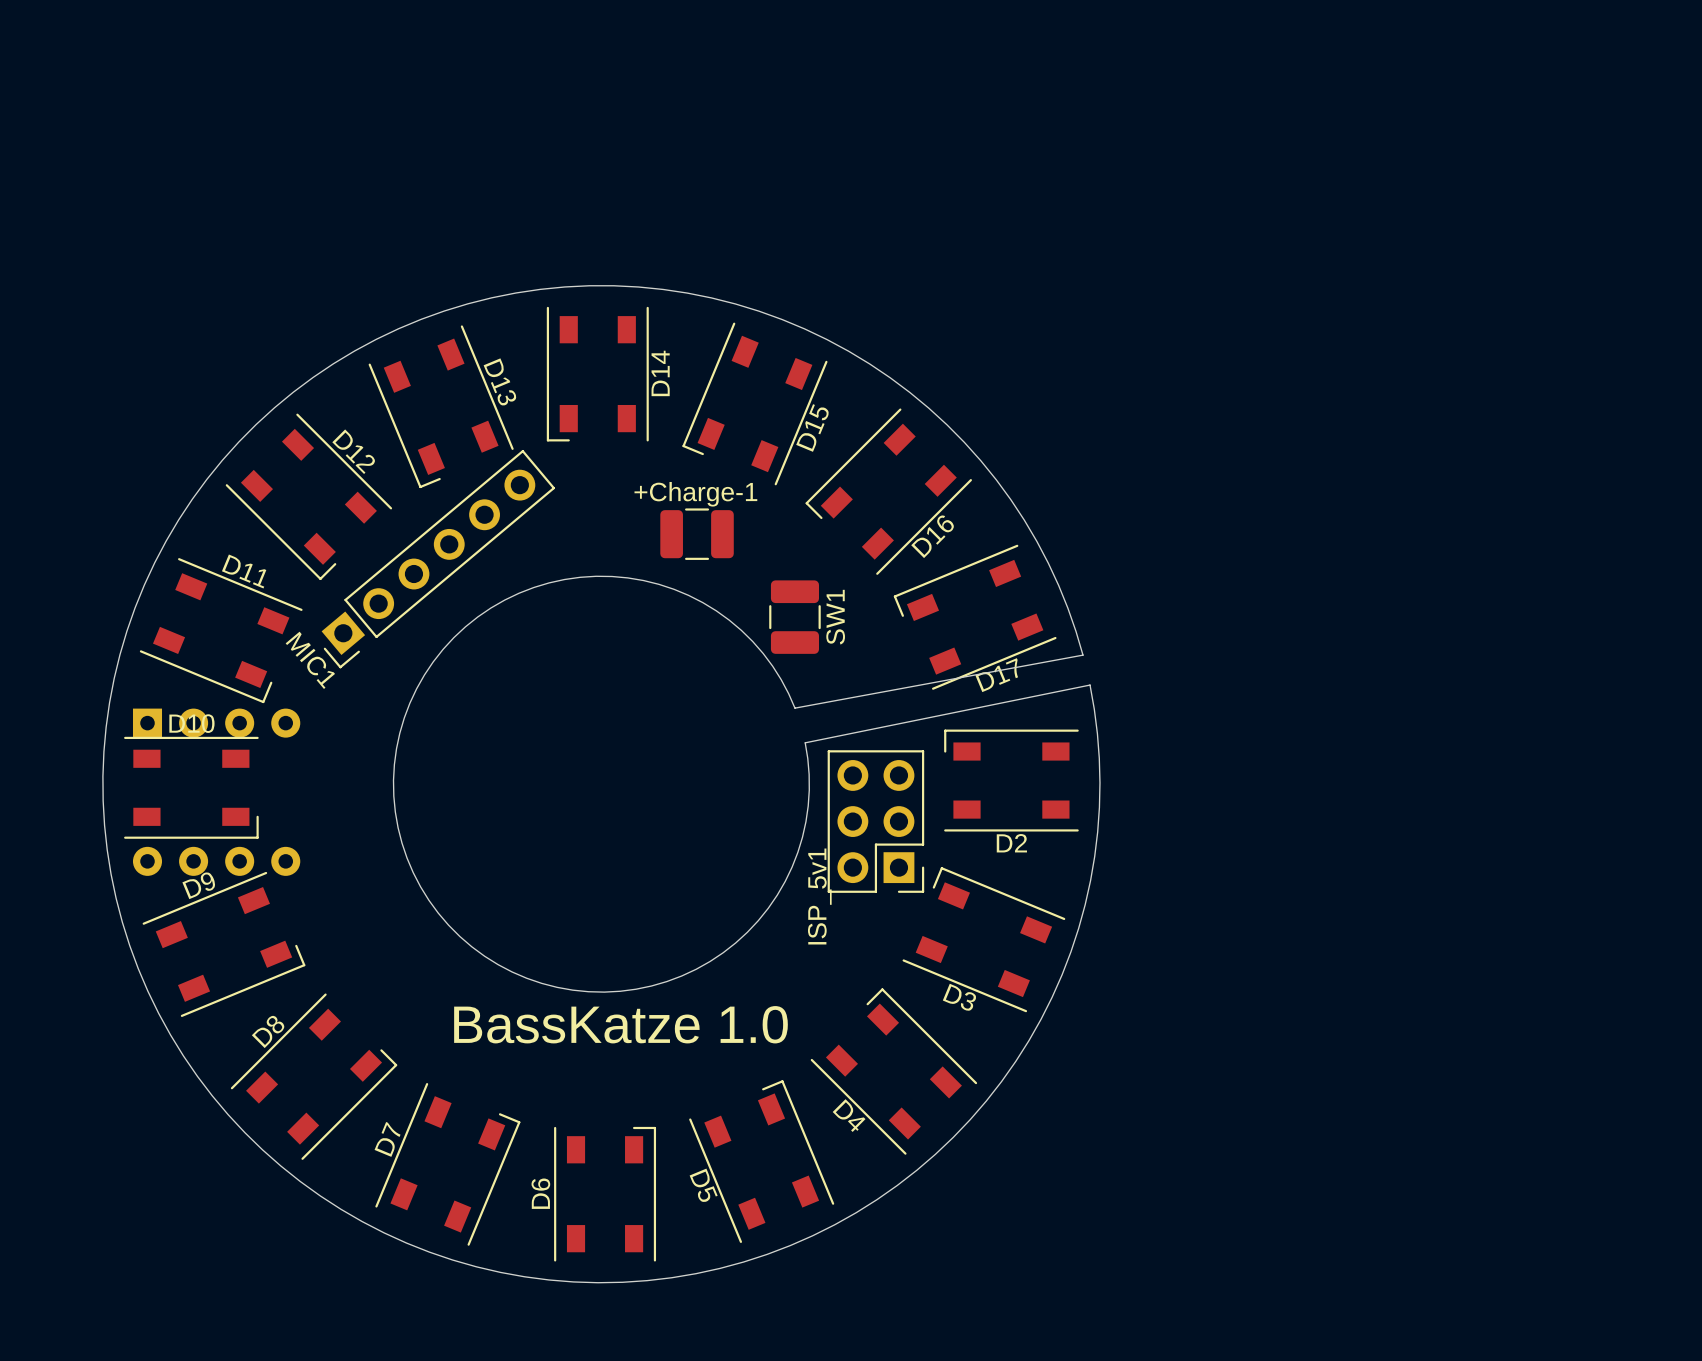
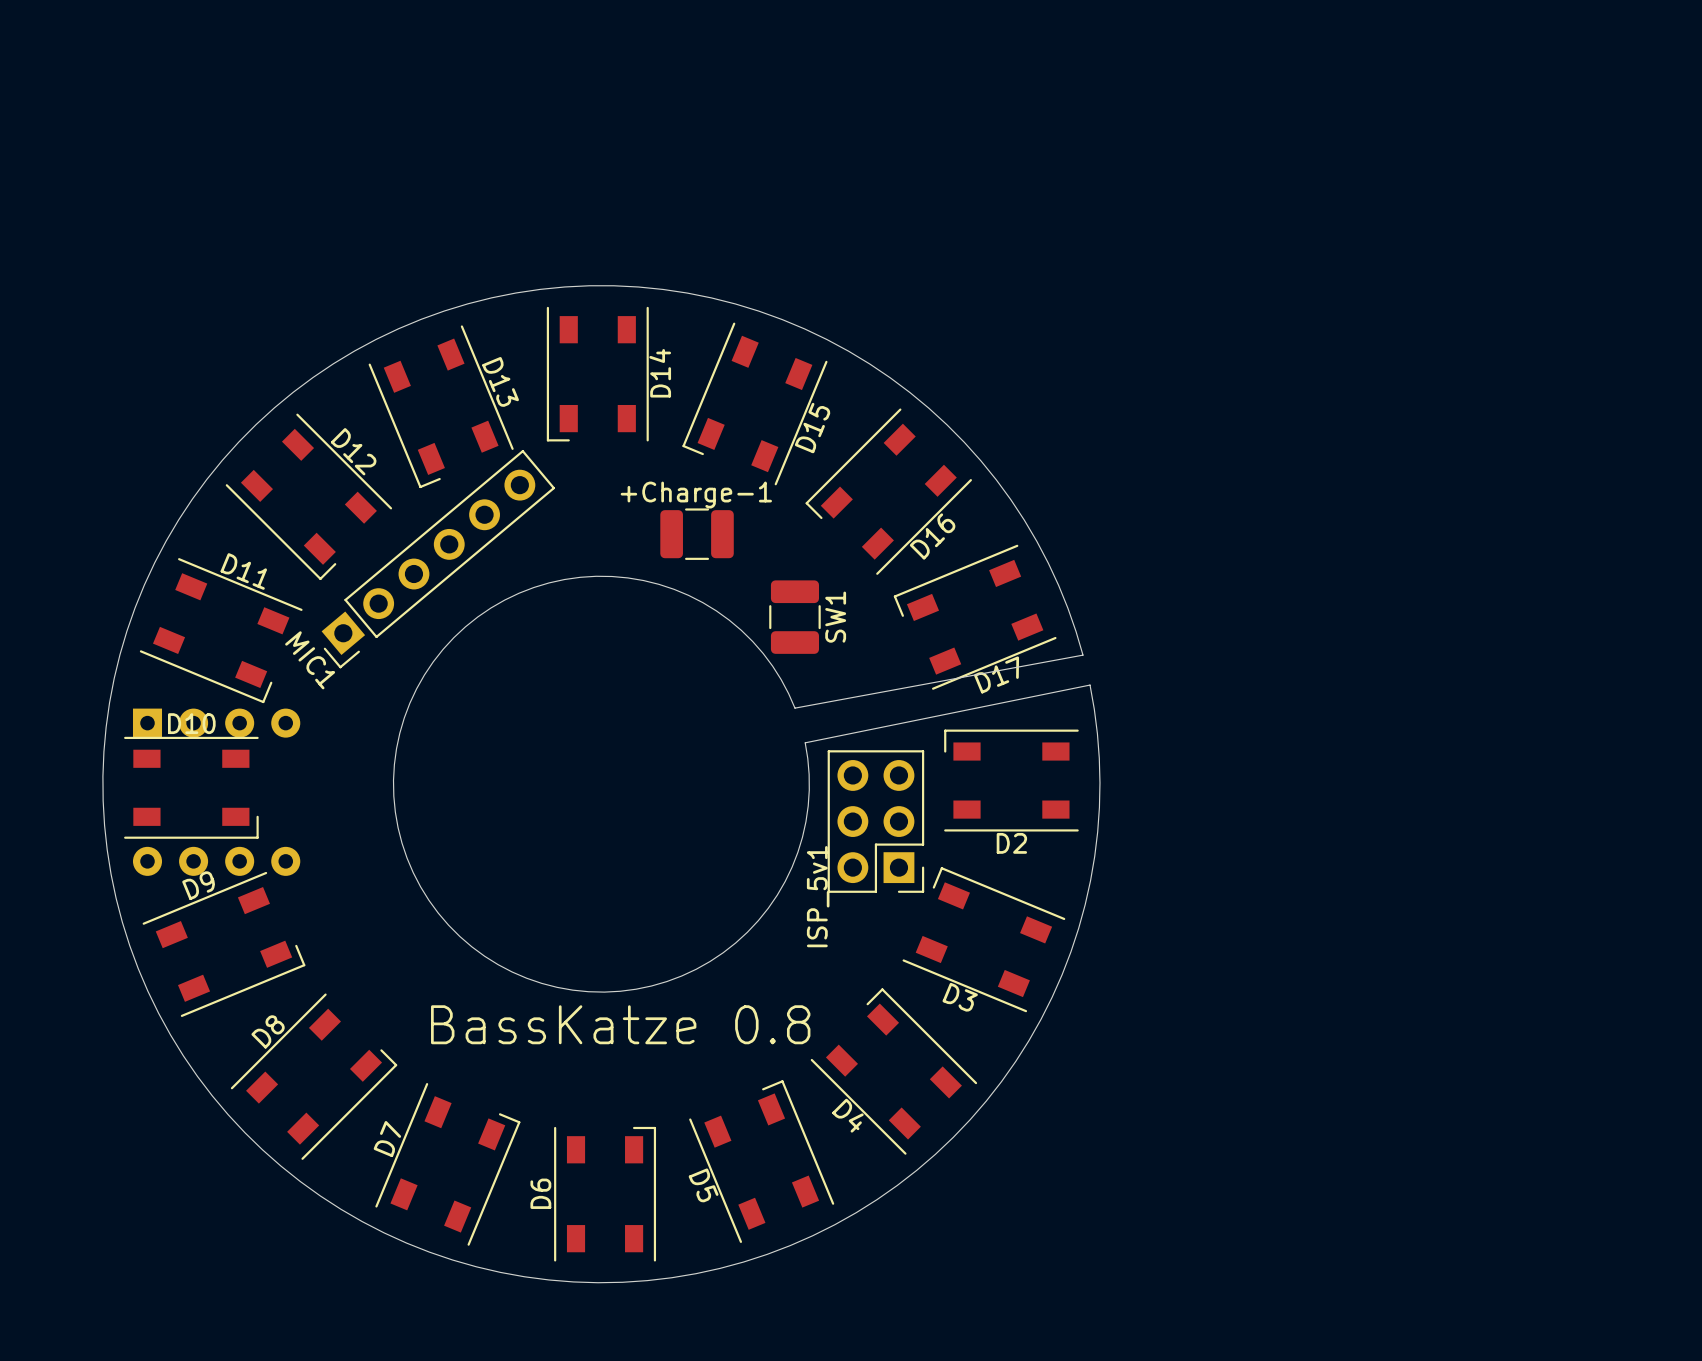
text: BassKatze 1.0 (620, 1024) -> BassKatze 0.8 (620, 1024)

